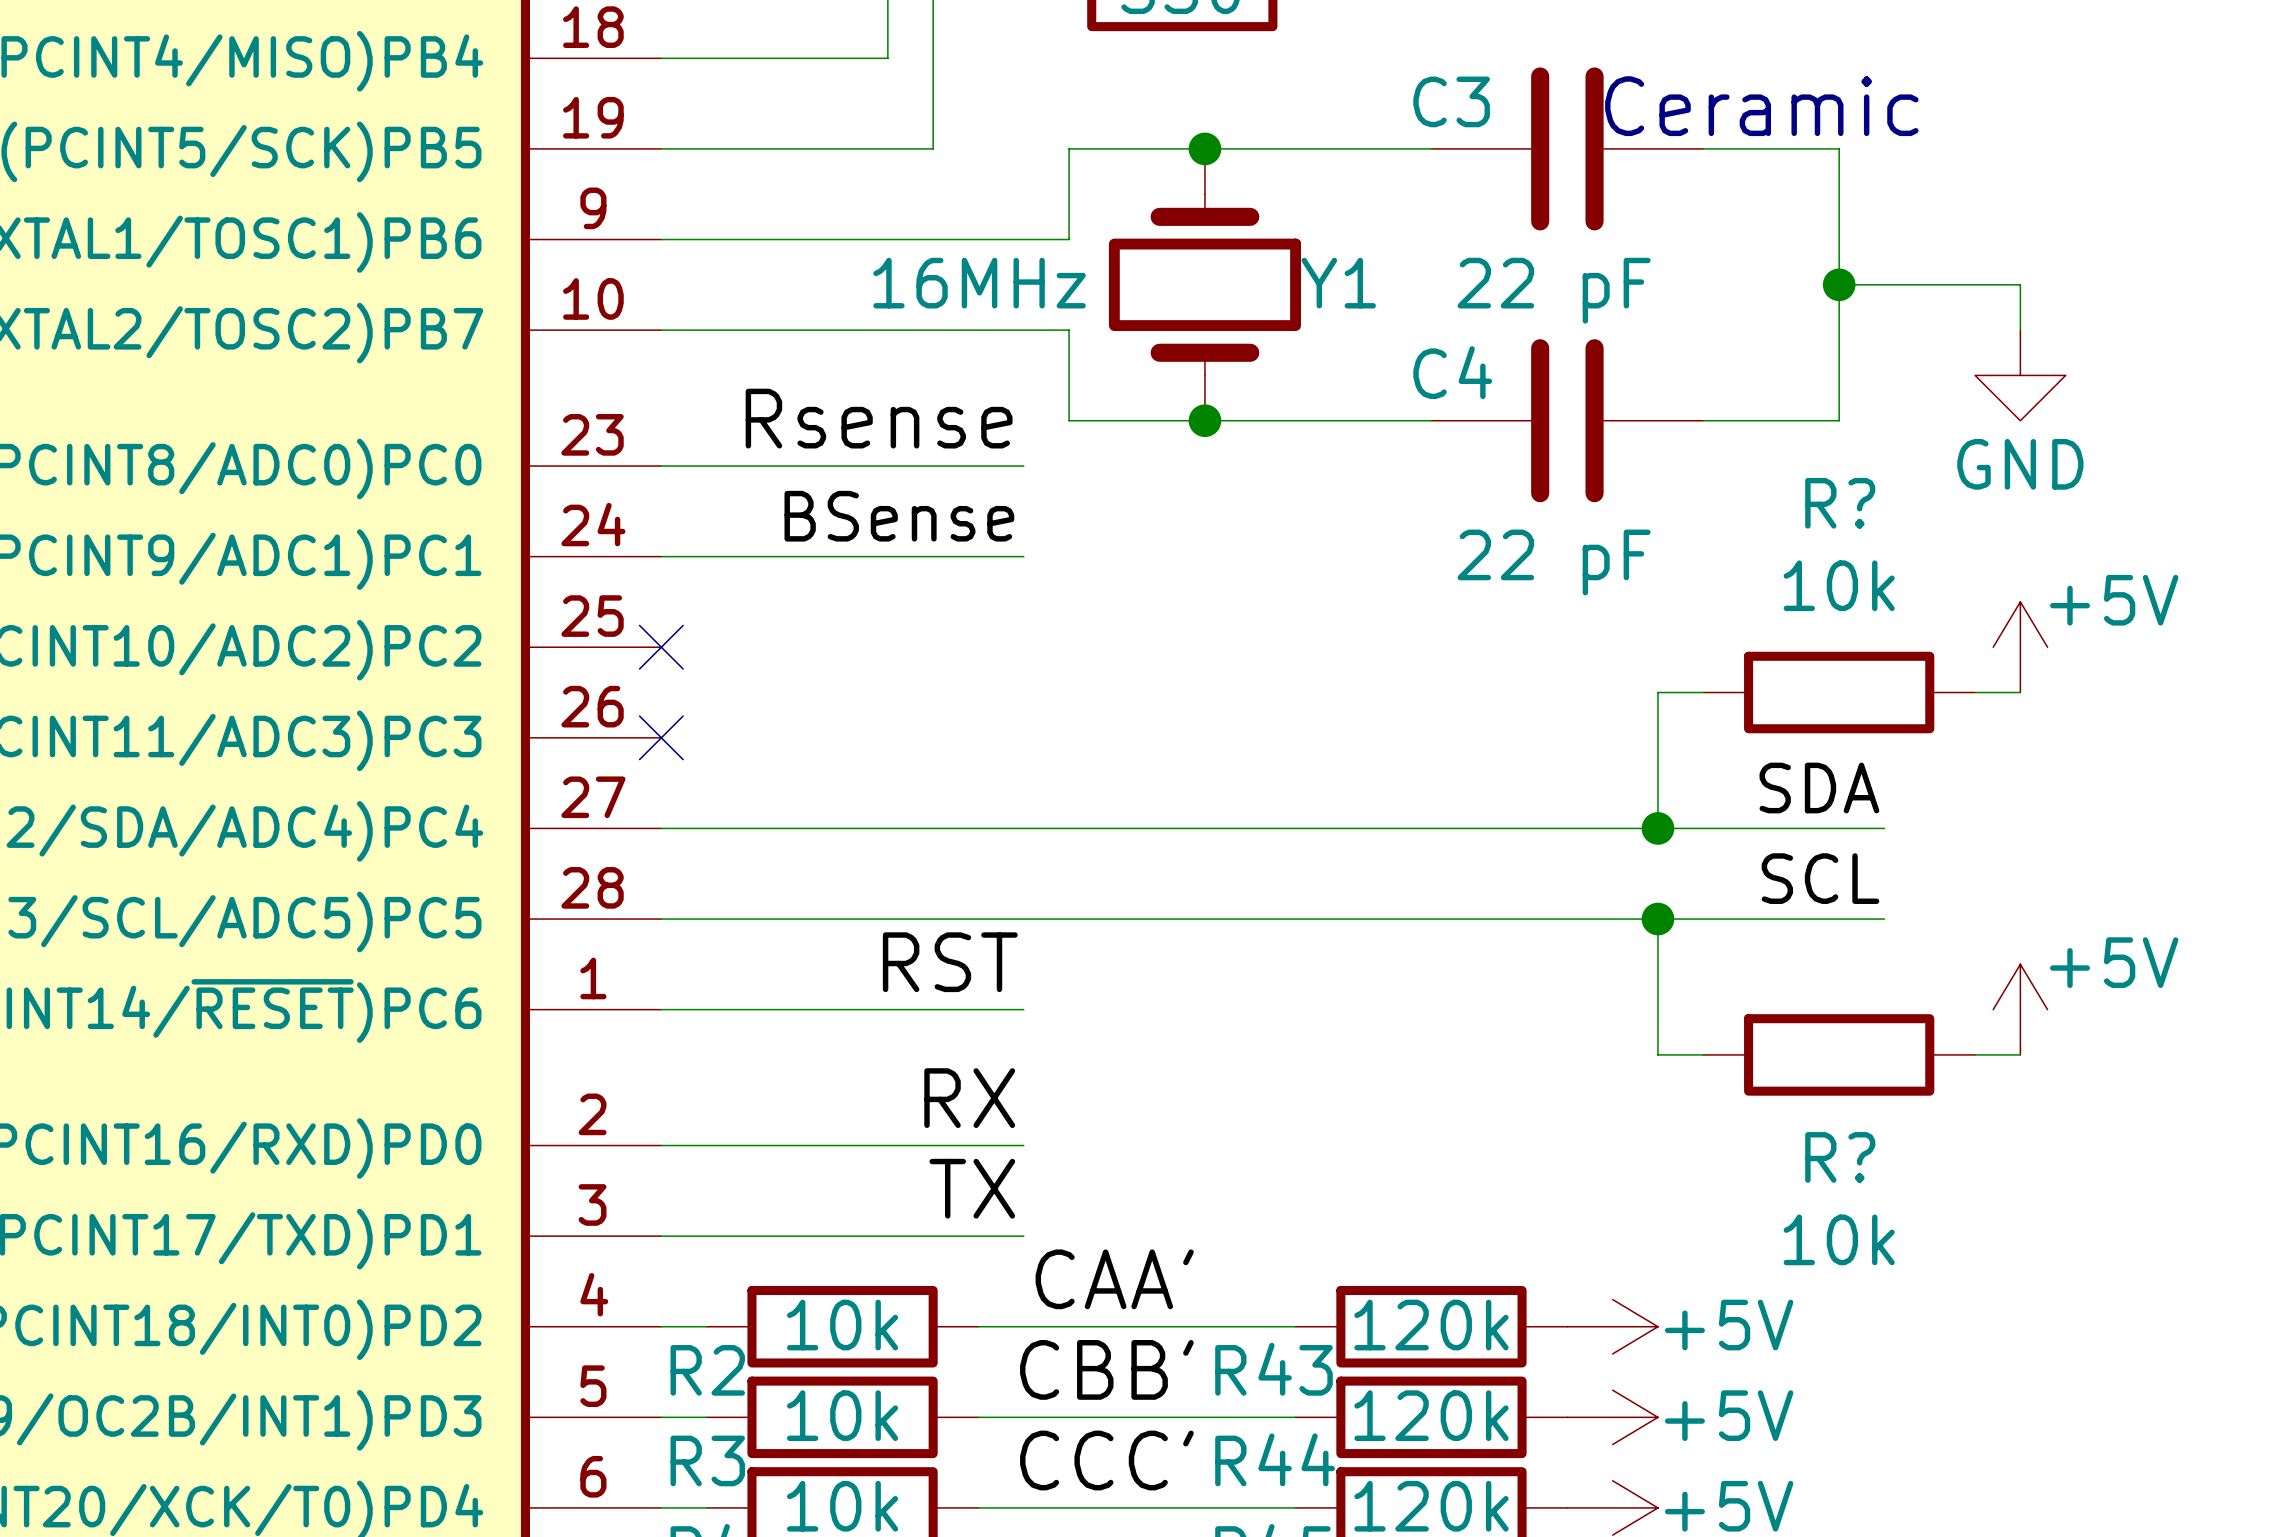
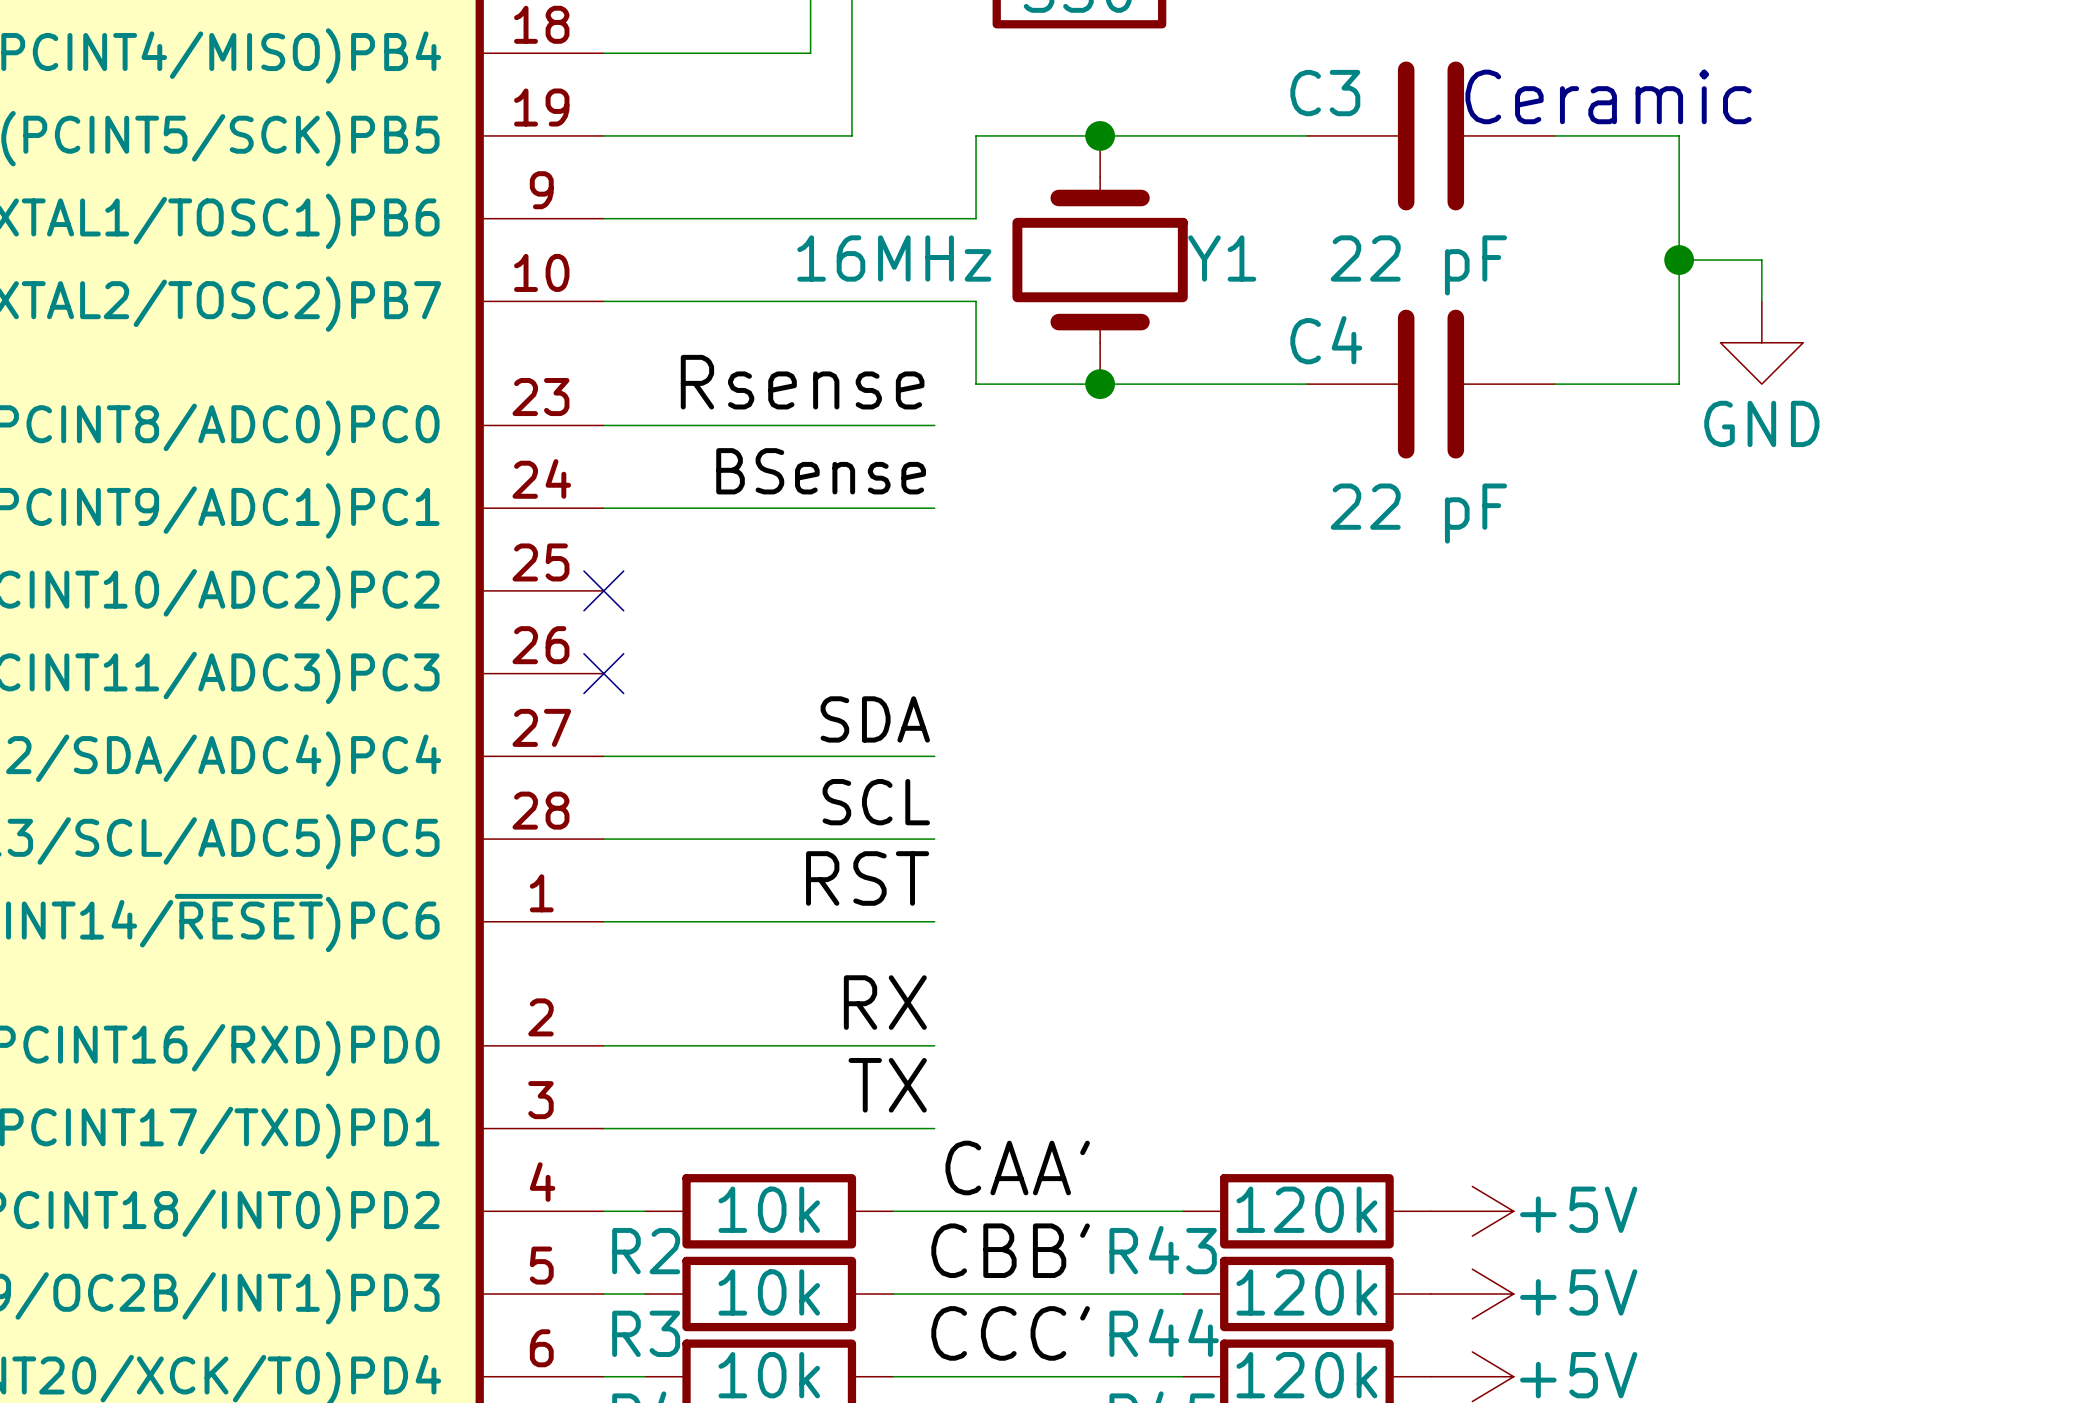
wire: (1929, 284) (2020, 284) (2020, 330) -> (1761, 260) (1761, 301)
power symbol position: GND (2020, 375) -> GND (1761, 342)
power symbol: +5V (2020, 647) -> none
wire: (1703, 692) (1657, 692) (1657, 828) -> none
R?: 10k (1839, 692) -> none
wire: (1975, 692) (2020, 692) -> none
label position: SDA (1819, 788) -> SDA (875, 719)
wire: (1023, 828) (1884, 828) -> none
junction: (1657, 828) -> none
label position: SCL (1820, 878) -> SCL (876, 802)
wire: (1023, 919) (1884, 919) -> none
wire: (1657, 919) (1657, 1054) (1703, 1054) -> none
junction: (1657, 919) -> none
power symbol: +5V (2020, 1009) -> none
R?: 10k (1839, 1054) -> none
wire: (1975, 1054) (2020, 1054) -> none

